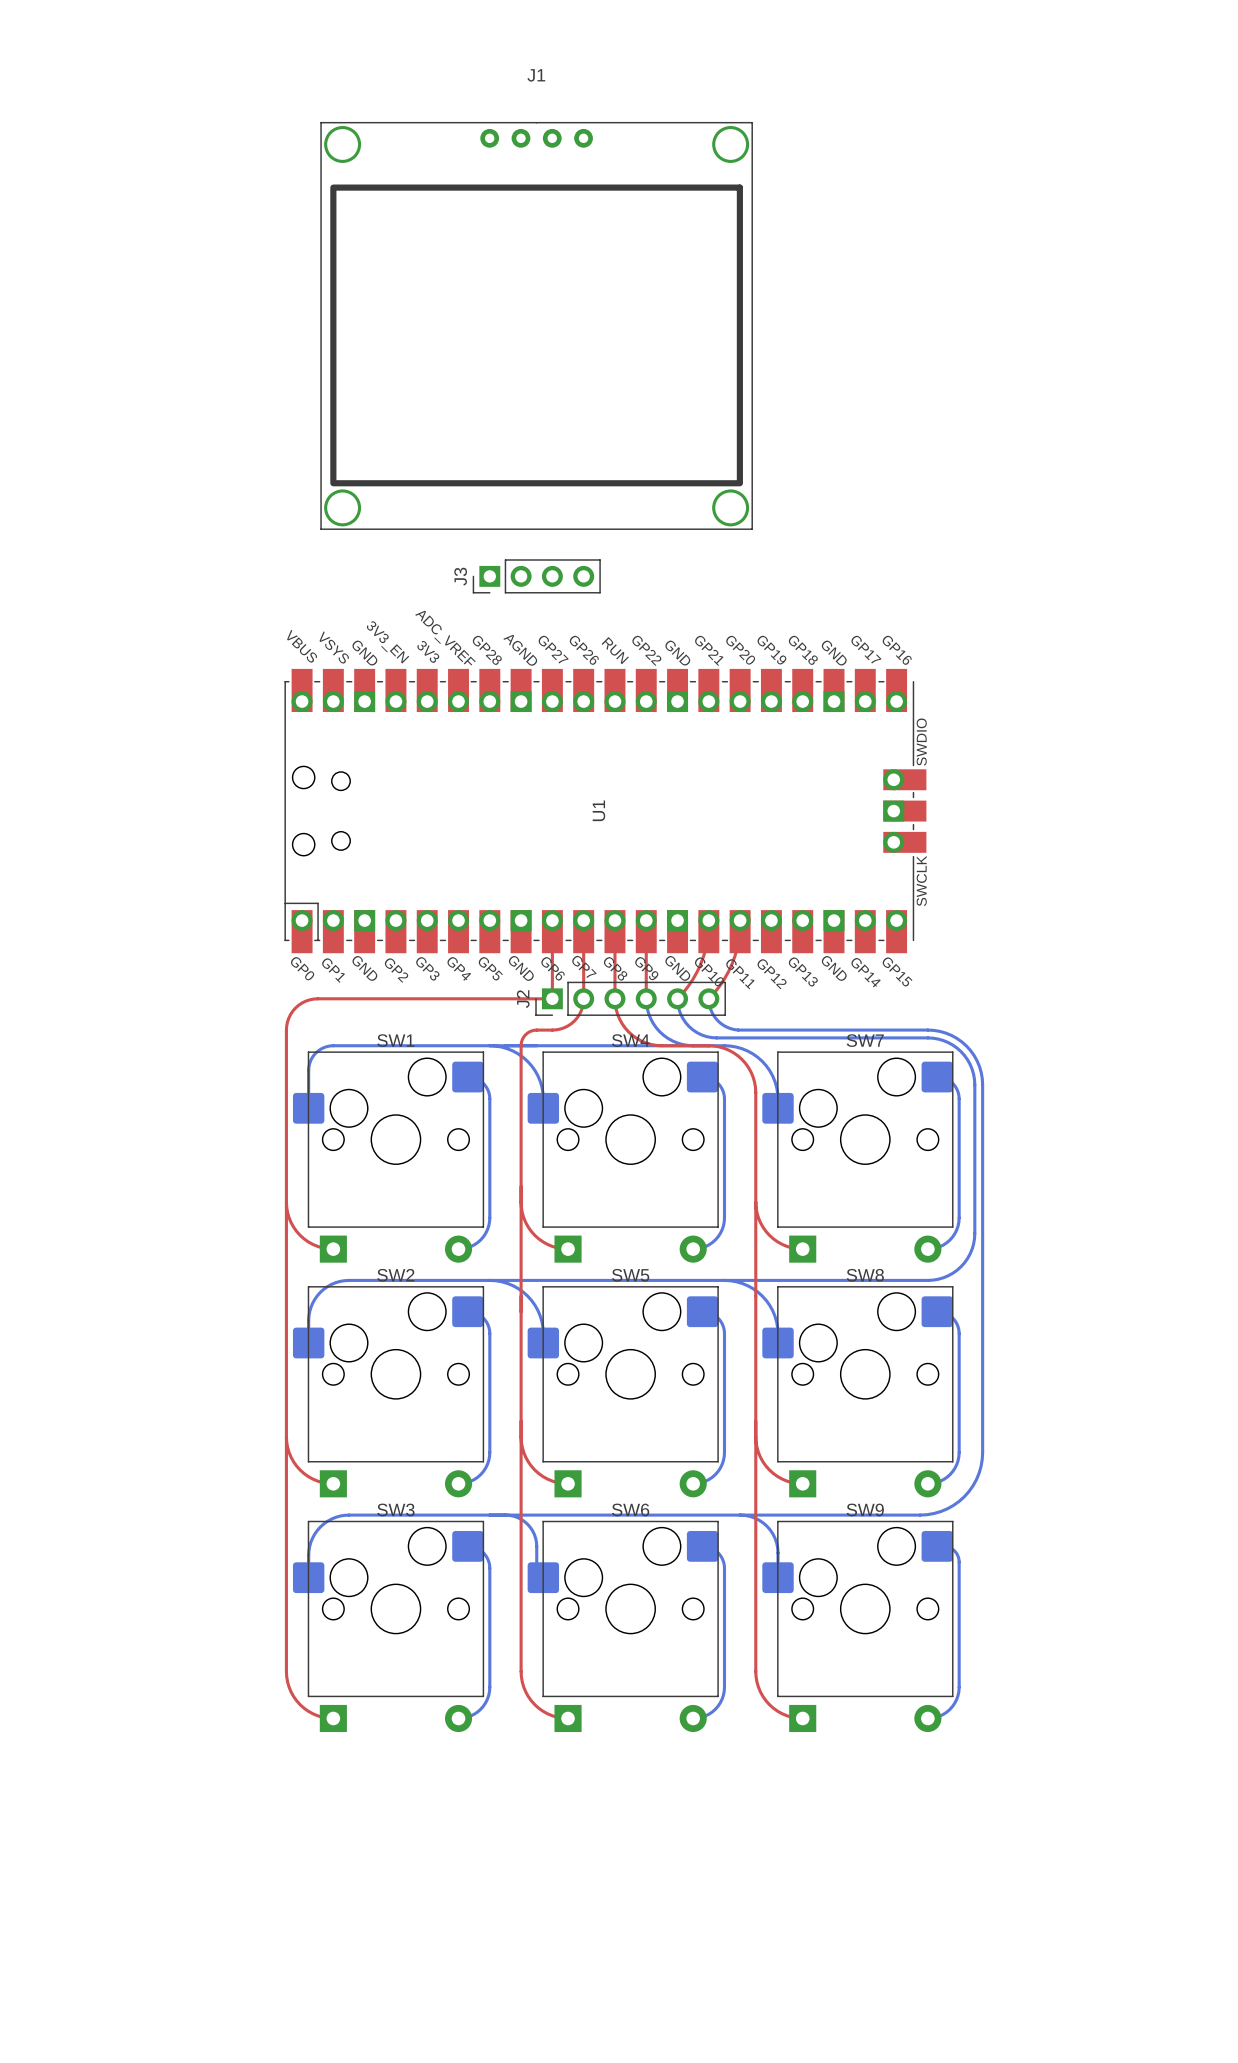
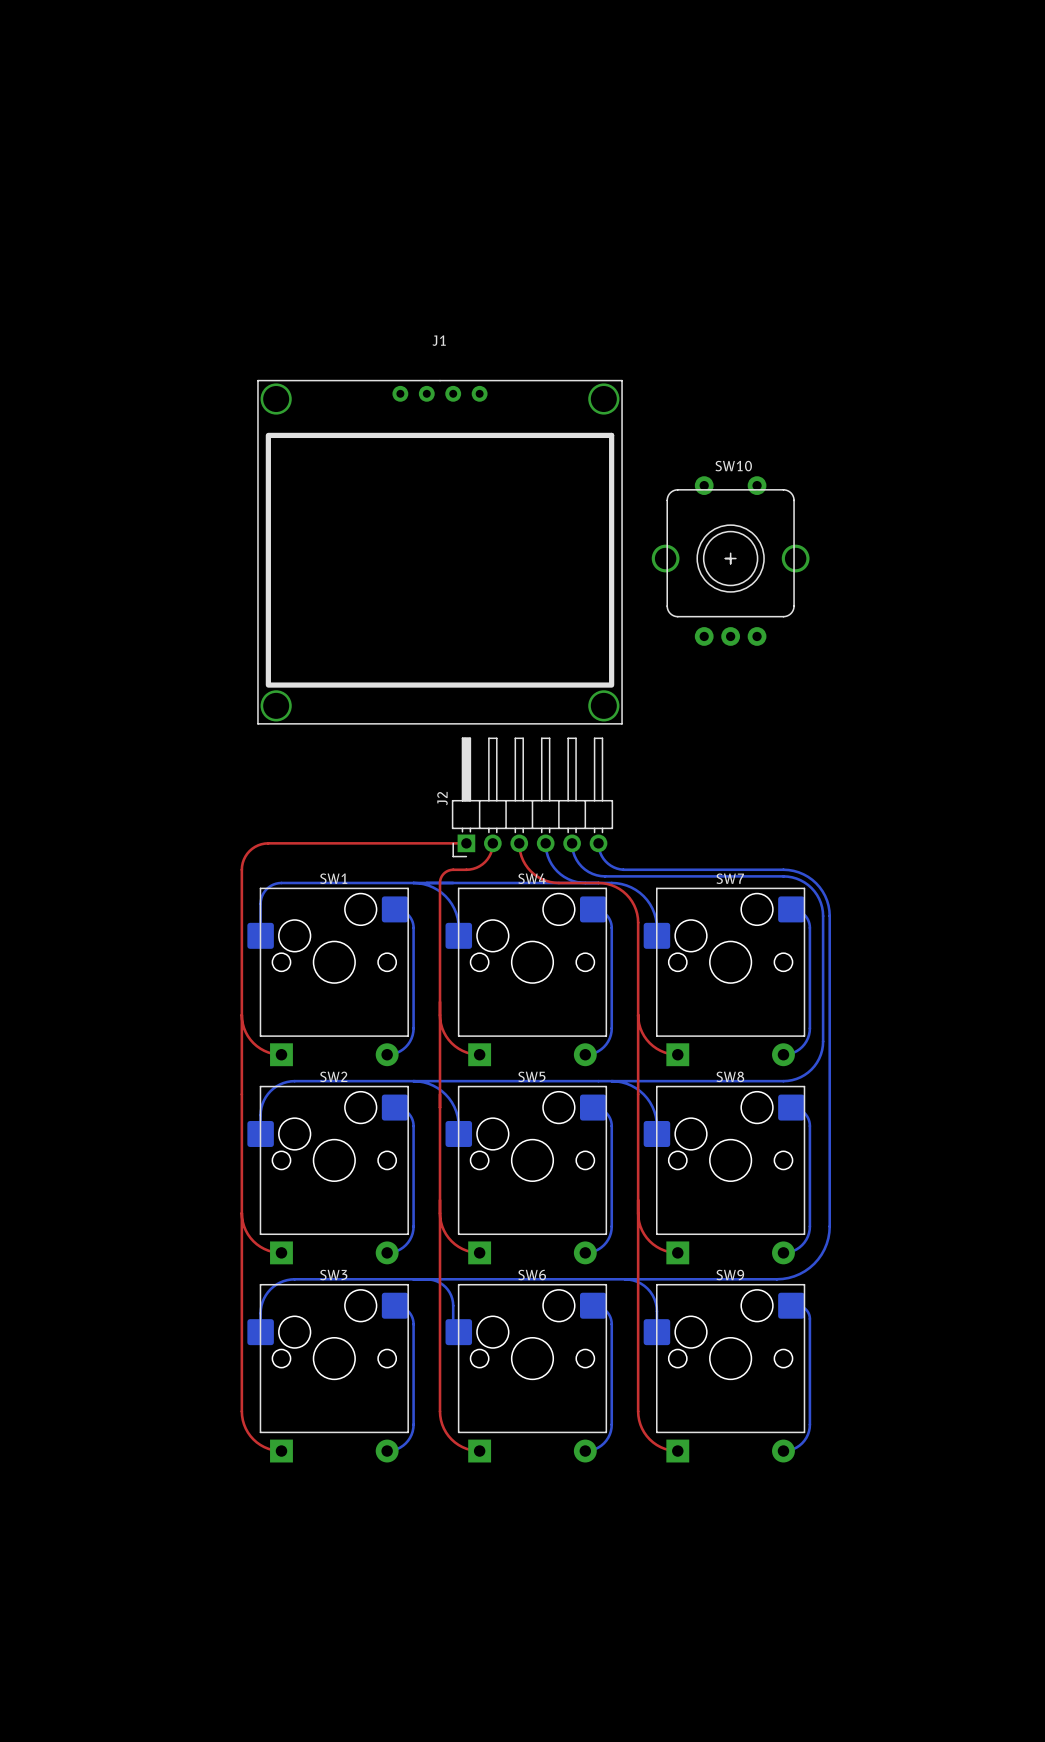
J1 position: (536, 325) -> (440, 552)
J3: (536, 576) -> none
SW10: none -> (730, 561)
U1: (605, 811) -> none
top track: (552, 920) (552, 998) -> none
top track: (583, 920) (583, 998) -> none
top track: (614, 920) (614, 998) -> none
top track: (646, 920) (646, 998) -> none
top track: (708, 920) (707, 939) (700, 964) (693, 979) (677, 998) -> none
top track: (740, 920) (738, 939) (732, 964) (724, 979) (708, 998) -> none
J2 footprint: [535, 981, 726, 1016] -> [451, 737, 613, 858]

